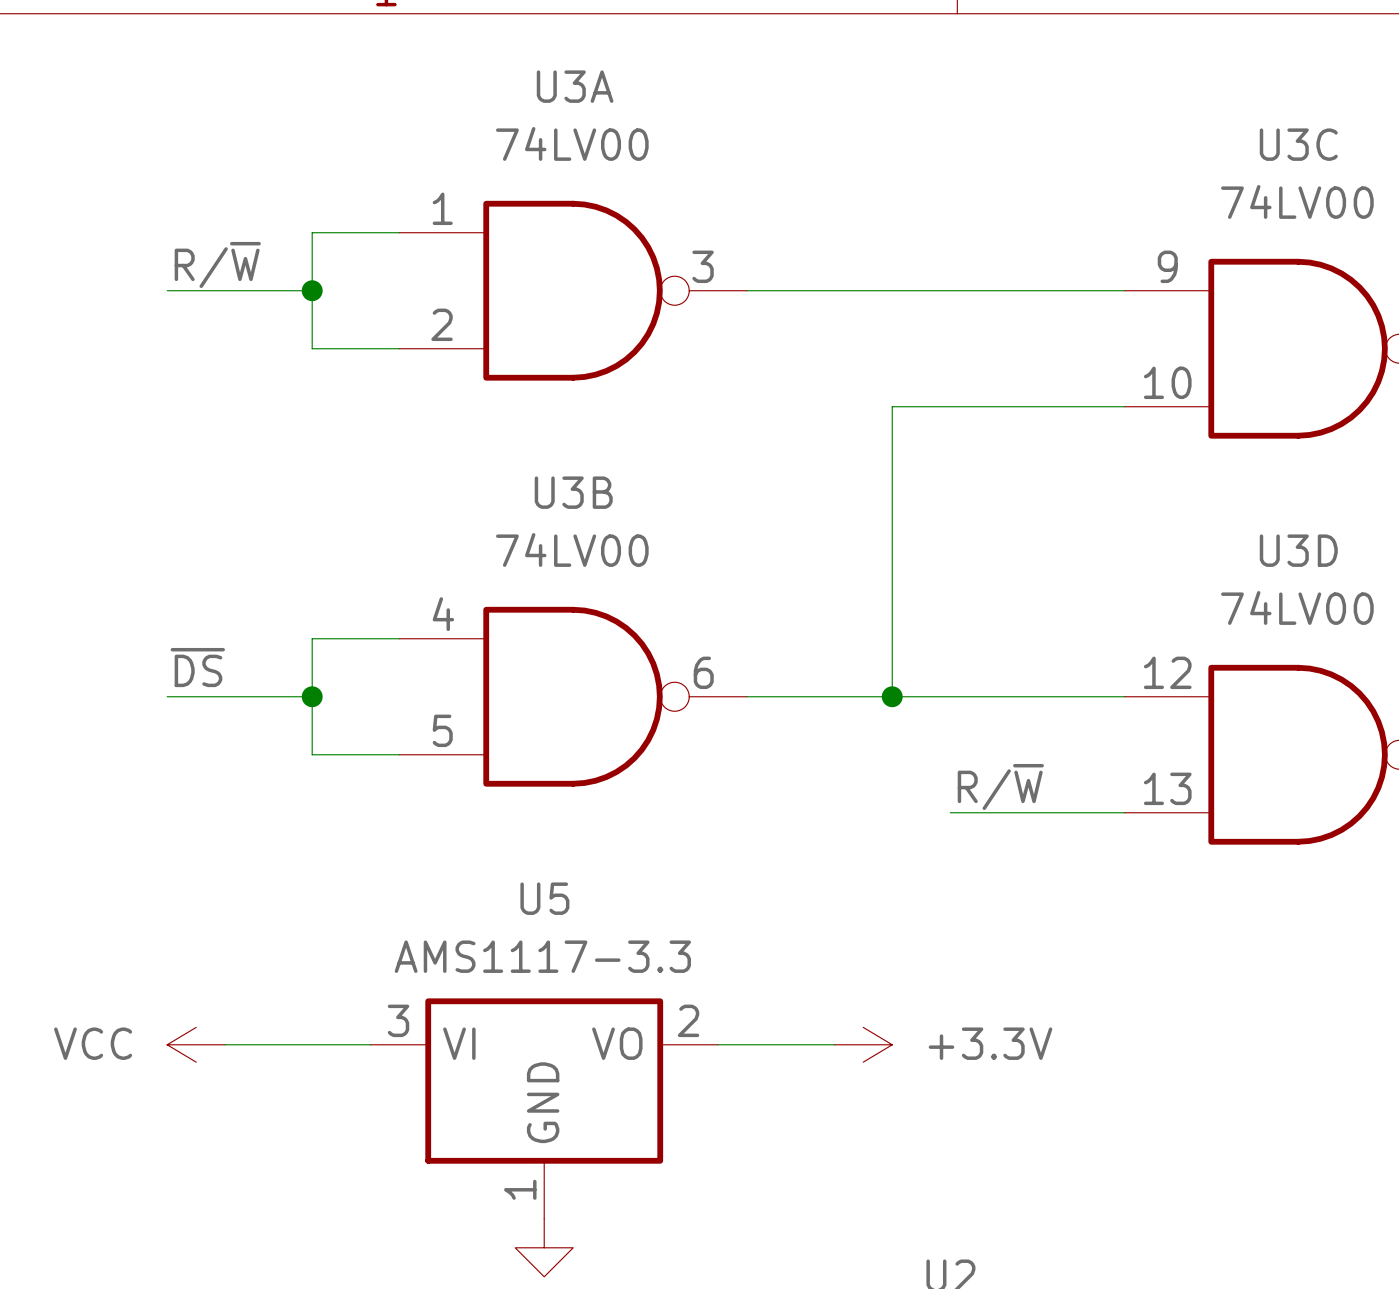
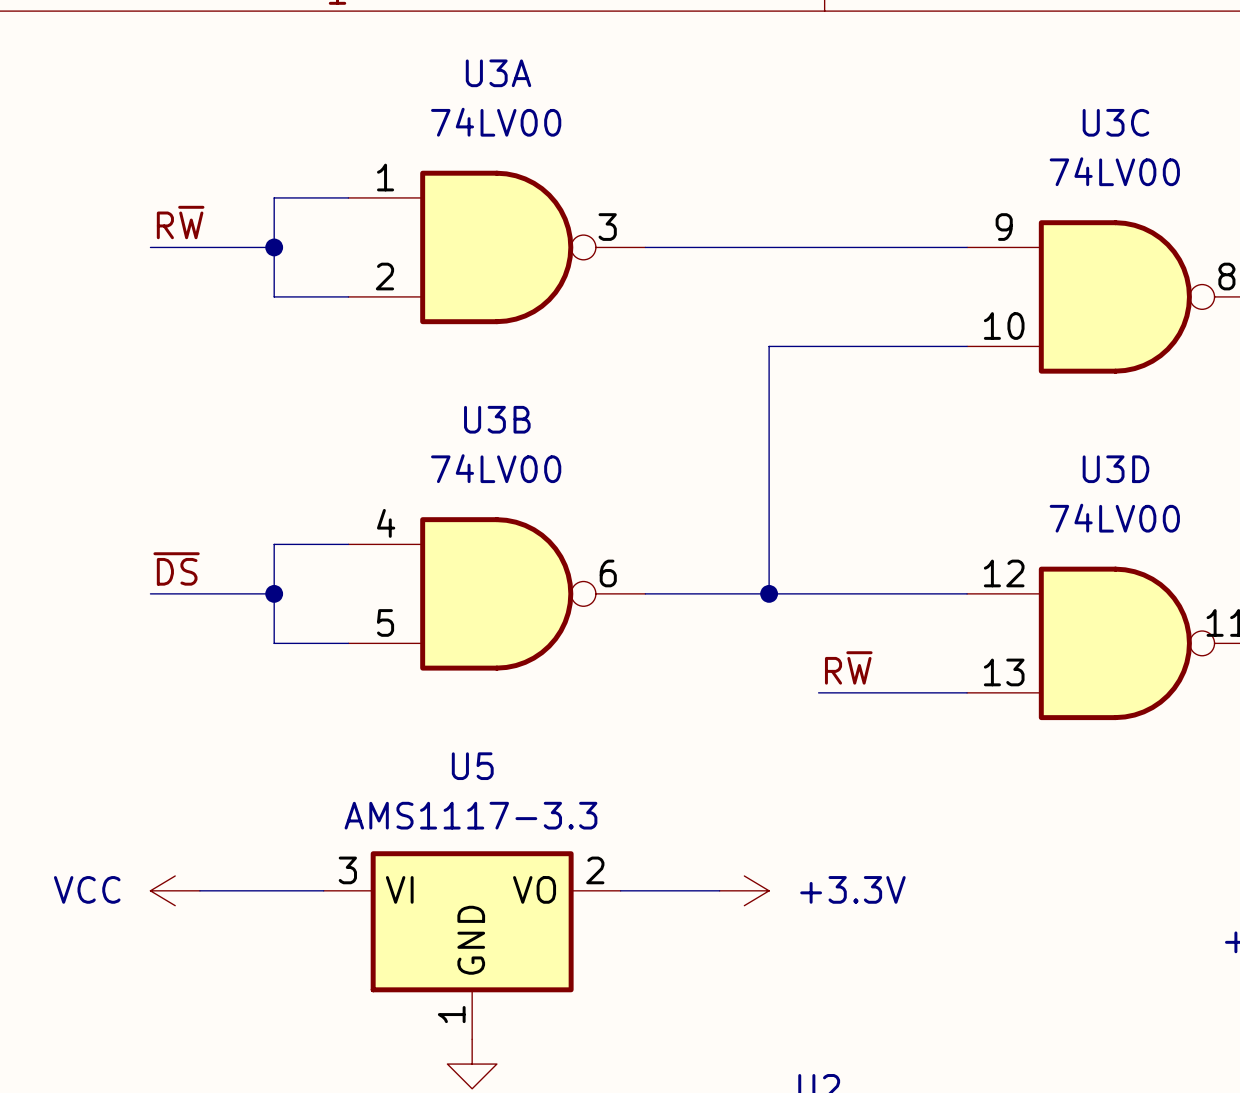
label: R/~{W} (217, 264) -> R~{W} (180, 222)
label: R/~{W} (1000, 787) -> R~{W} (848, 667)

